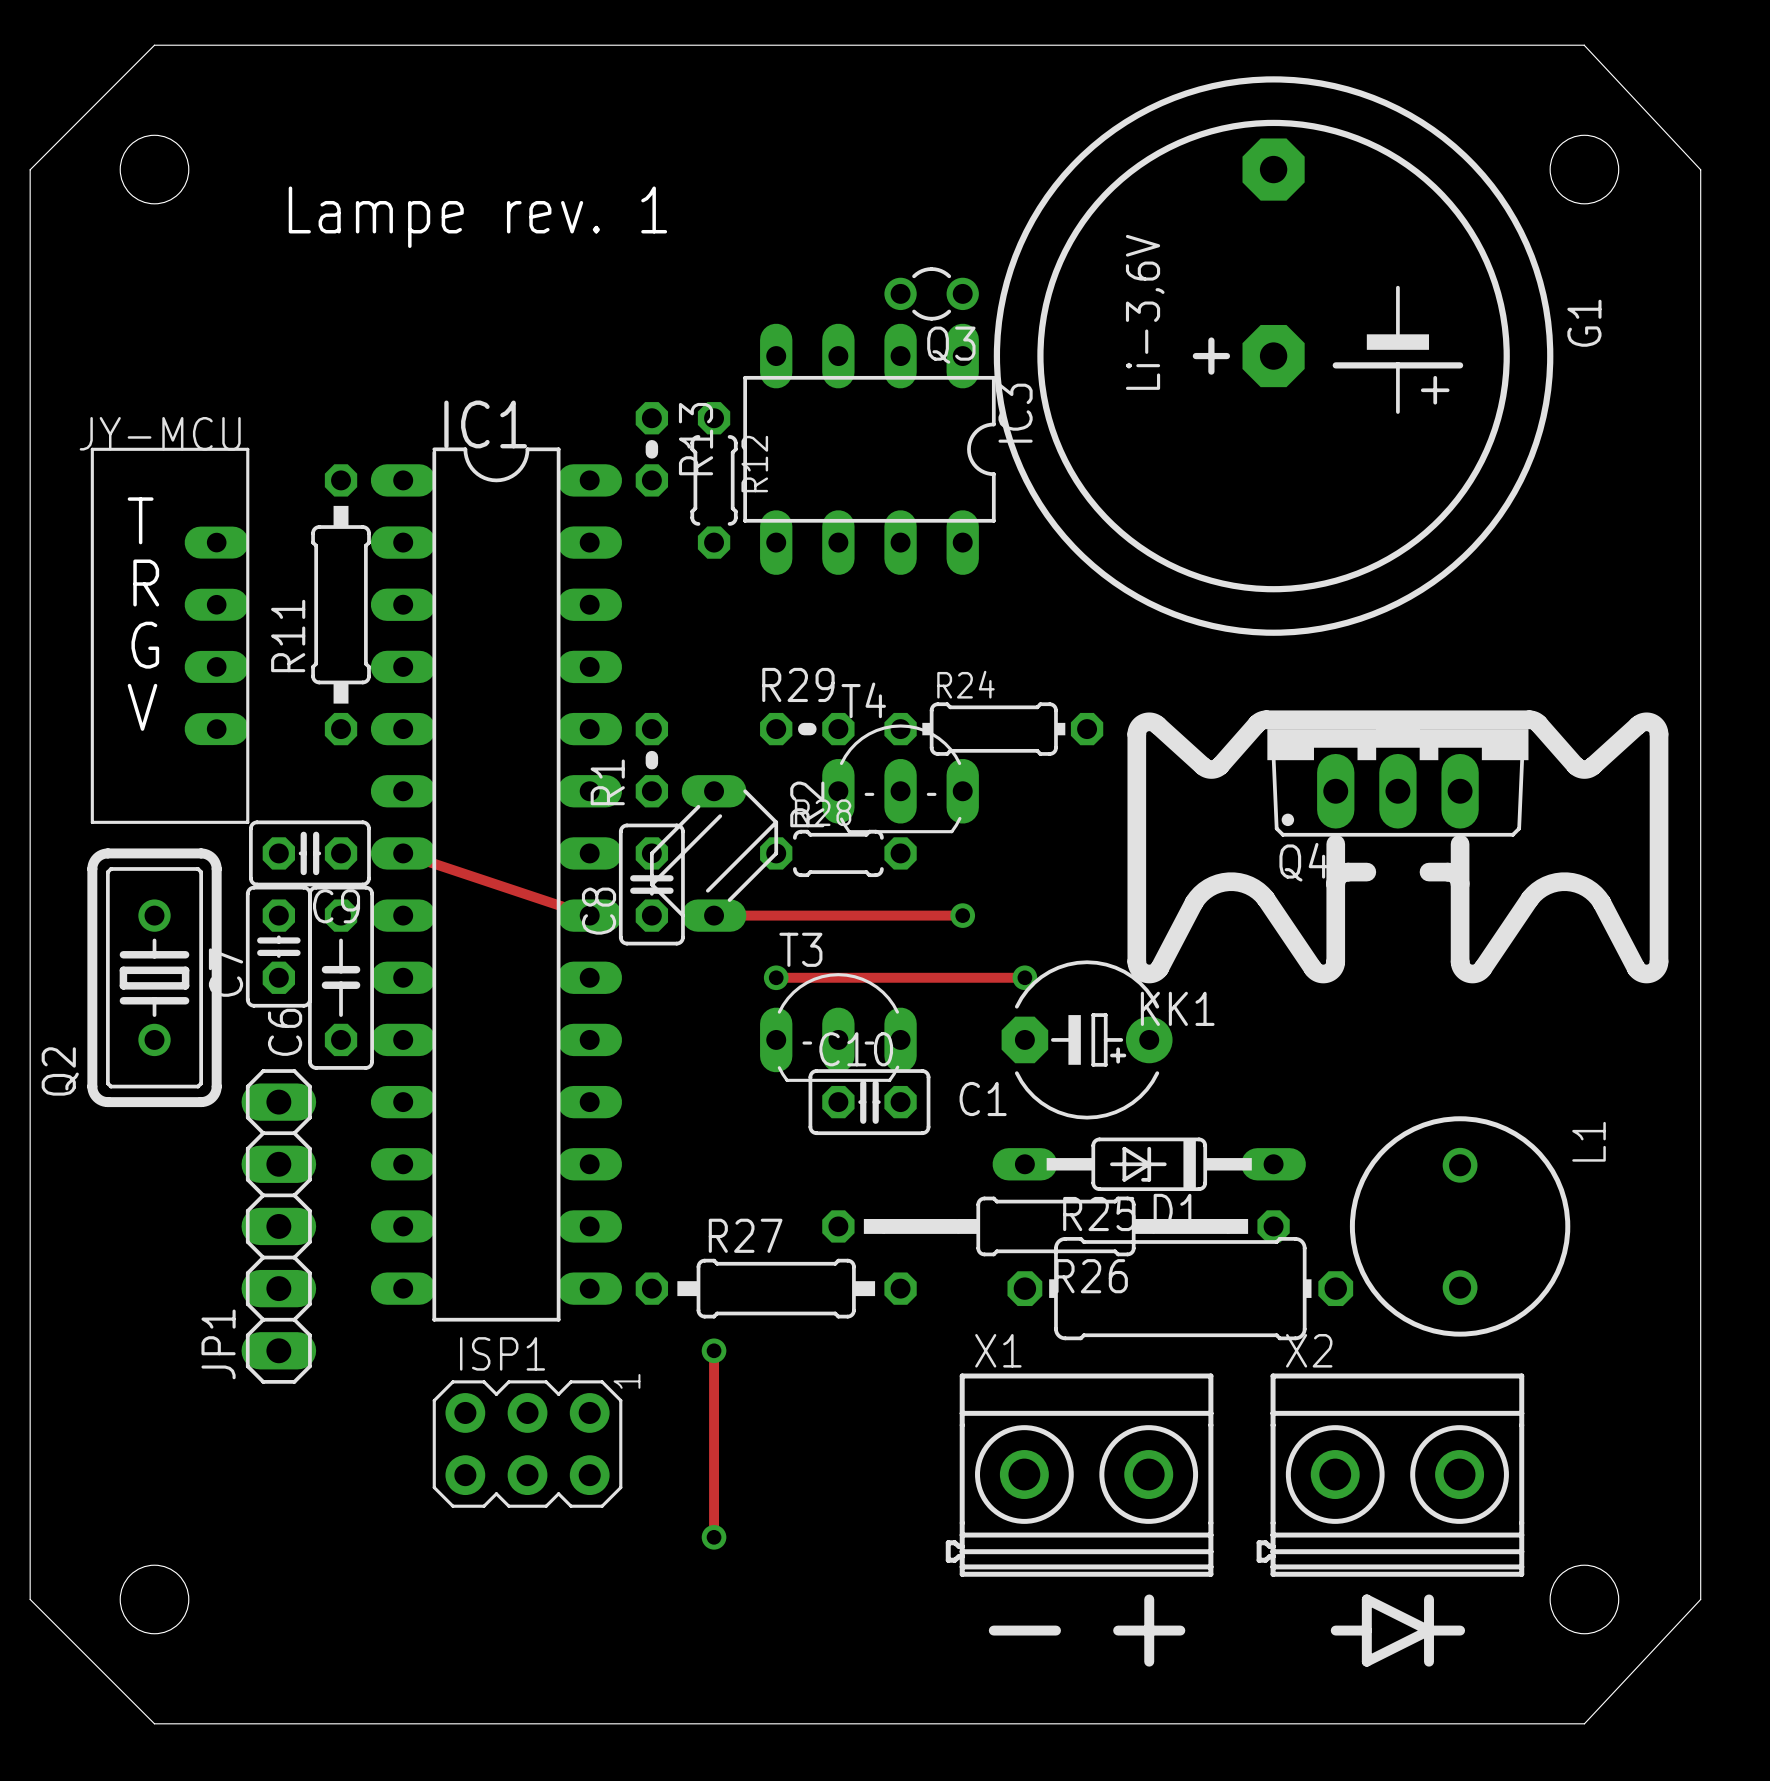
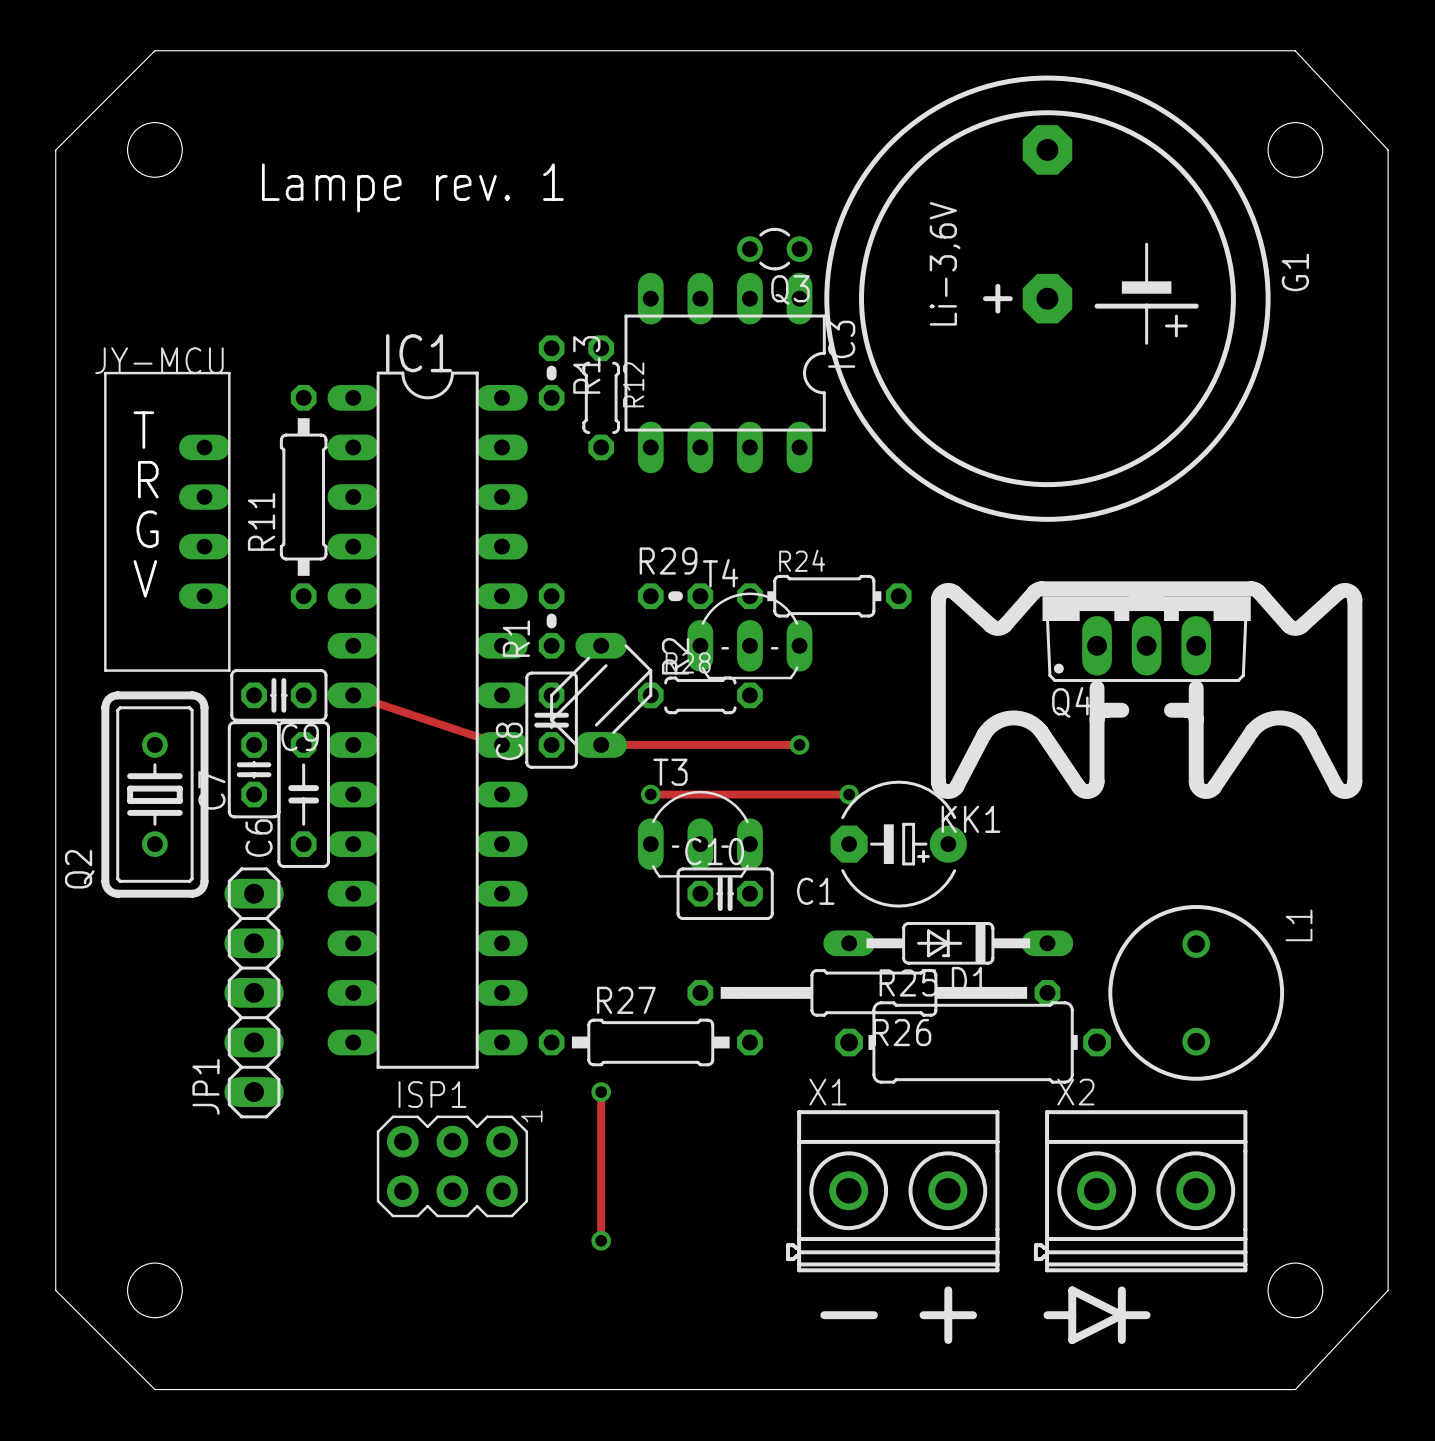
line: (1366, 1599) (1429, 1630) -> none
line: (1429, 1599) (1429, 1661) -> none
line: none -> (1047, 1315) (1072, 1315)
line: (1335, 1630) (1366, 1630) -> (1121, 1315) (1072, 1290) (1072, 1339) (1121, 1315)
line: (1429, 1630) (1460, 1630) -> (1121, 1315) (1146, 1315)
line: (1429, 1630) (1366, 1661) -> none

